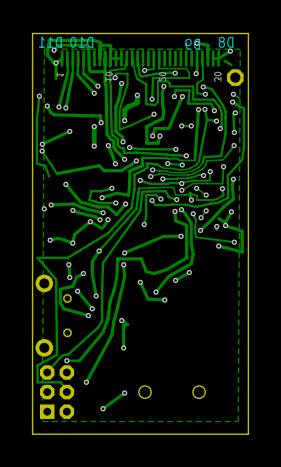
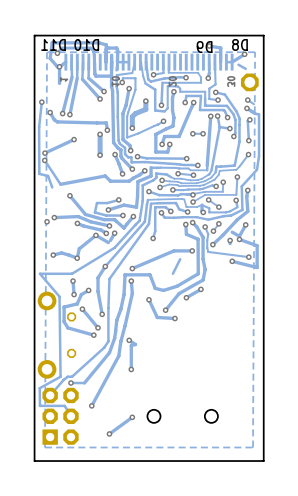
track: none -> (180, 259) (172, 273)

